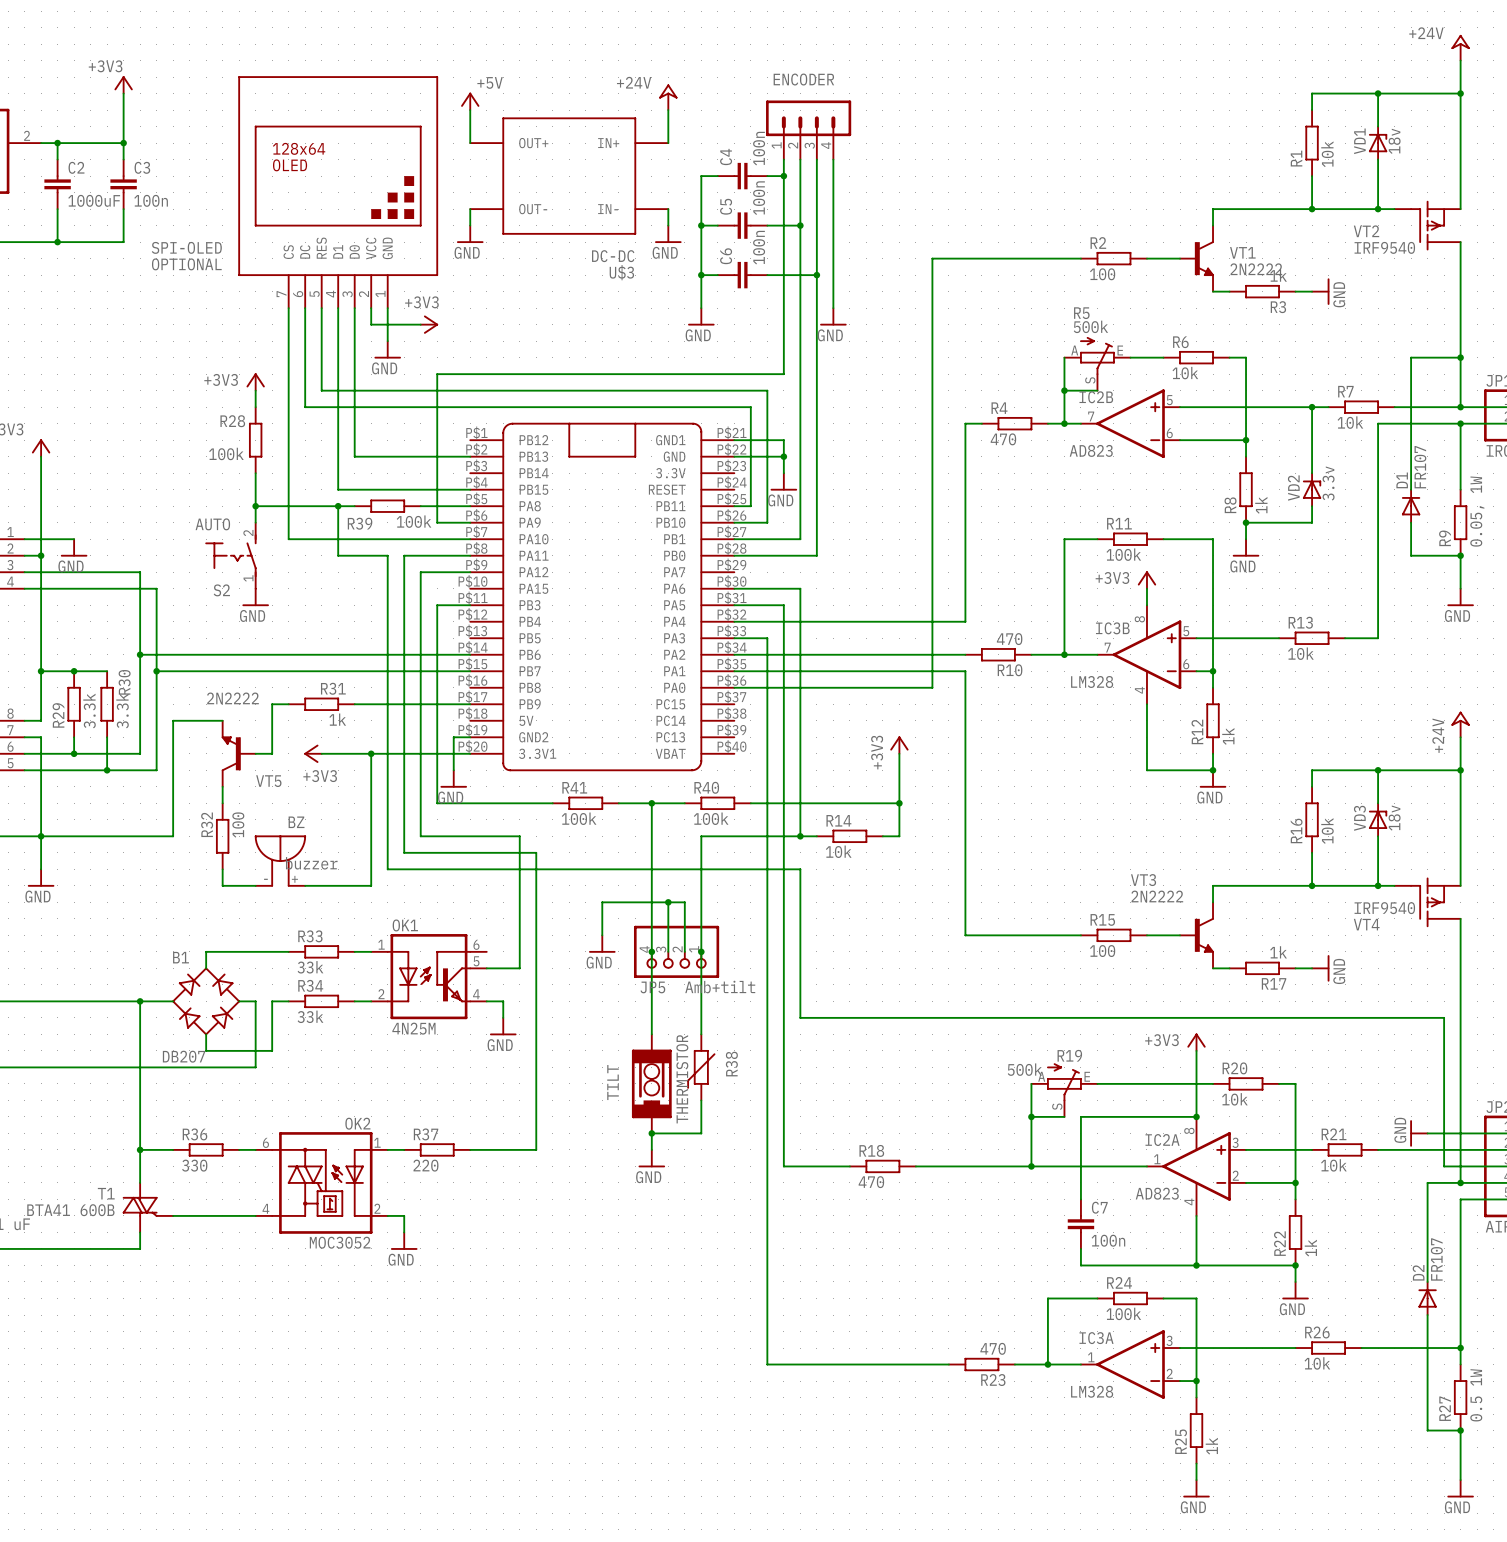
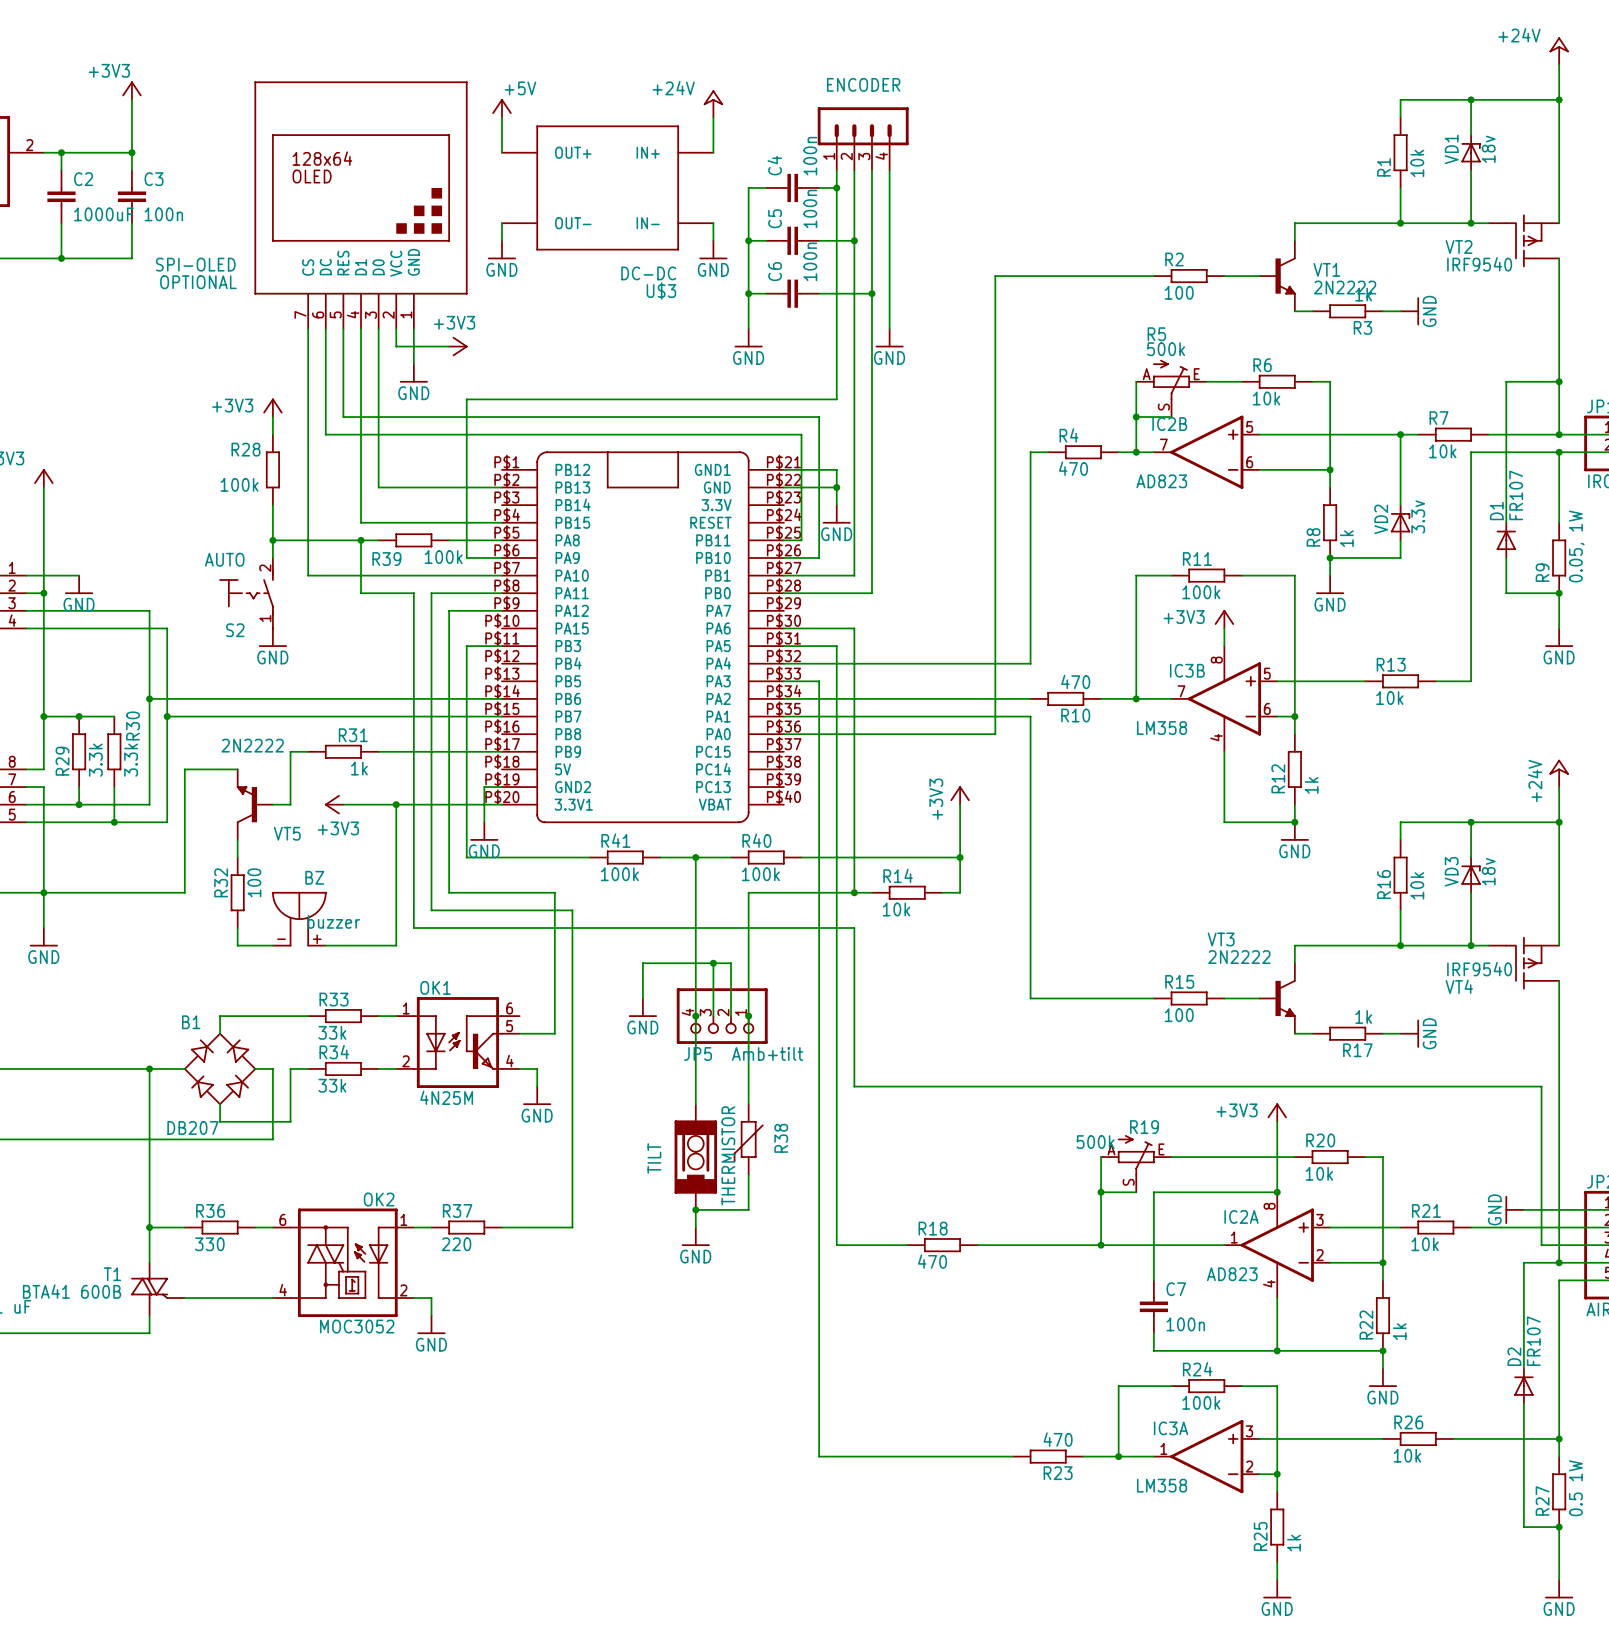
IC3B value: LM328 (1092, 681) -> LM358 (1162, 728)
IC3A value: LM328 (1092, 1391) -> LM358 (1162, 1485)

